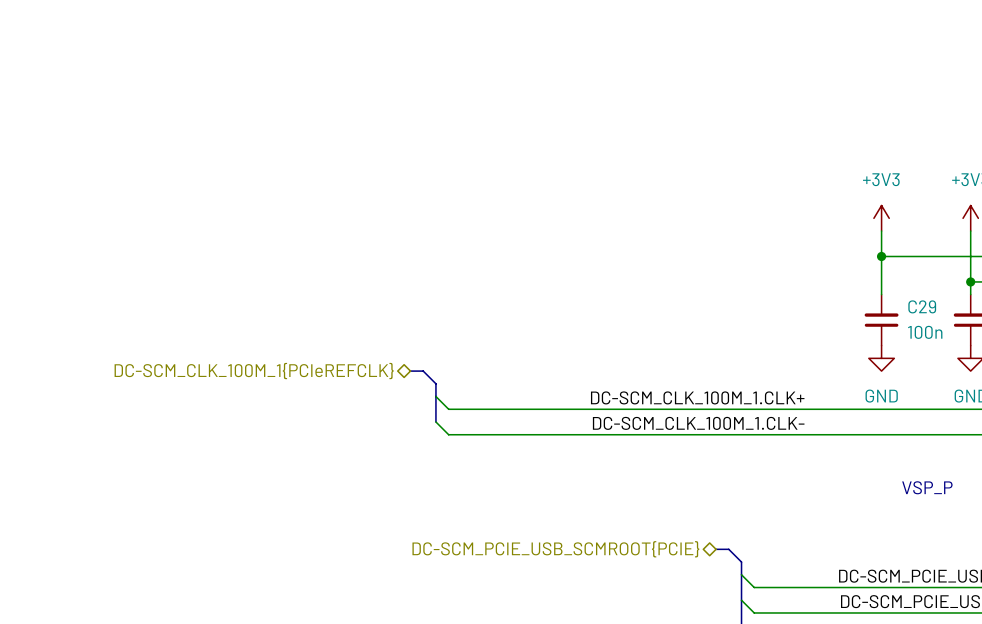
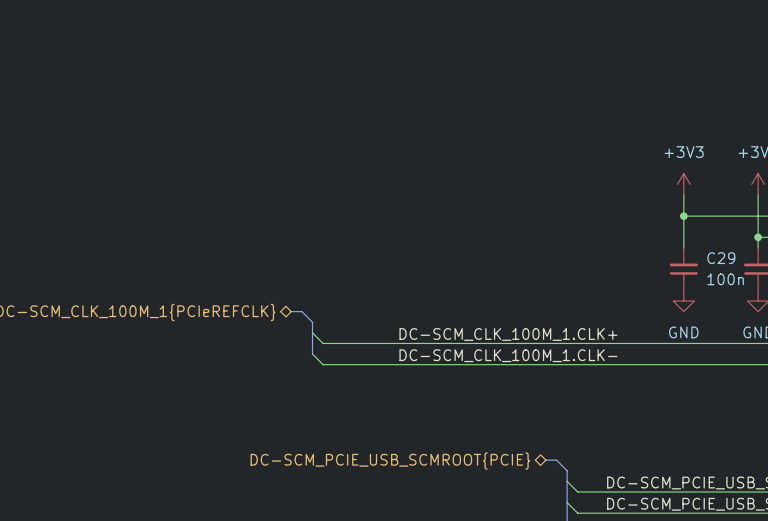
text: VSP_P (927, 487) -> none

